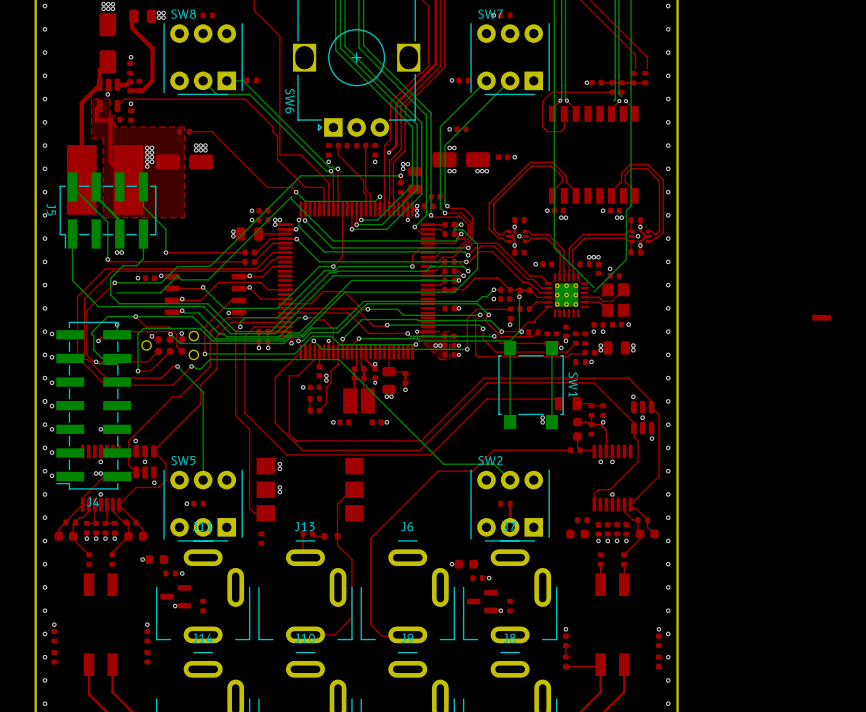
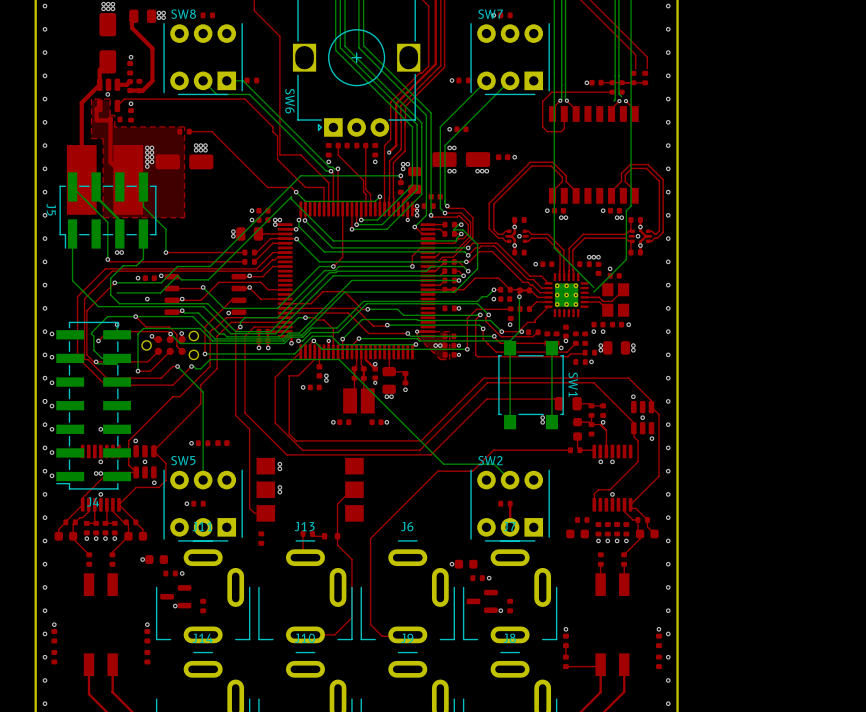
via: none -> (147, 299)
part: (819, 317) -> none
part: (823, 317) -> none
top track: (338, 351) (338, 364) (331, 371) (331, 382) (326, 387) (326, 403) (319, 410) -> none
top track: (310, 398) (310, 410) -> none
part position: (314, 398) -> (203, 443)
part position: (314, 410) -> (222, 443)
via: none -> (191, 443)

